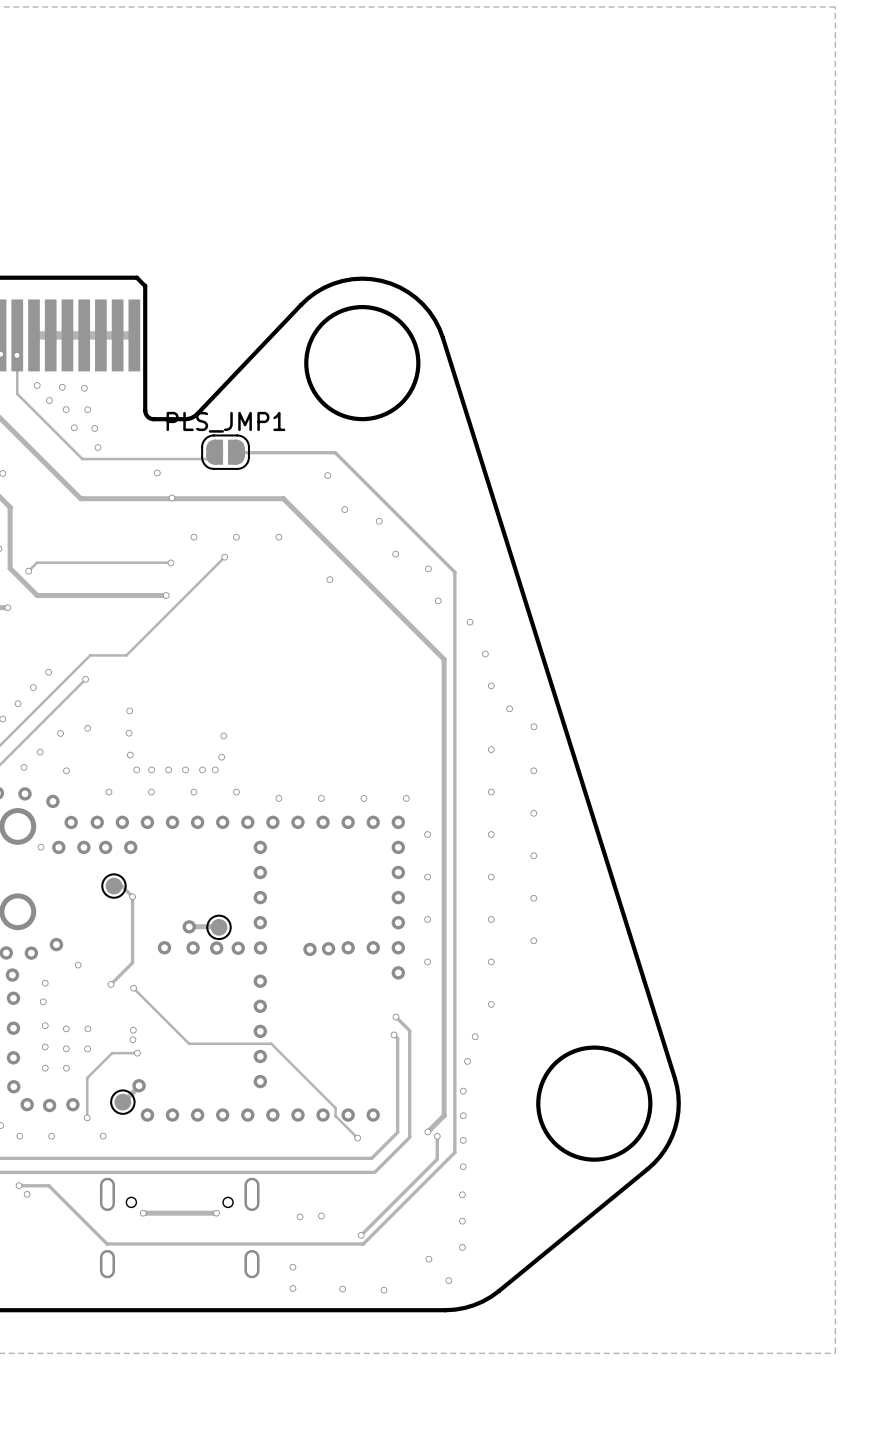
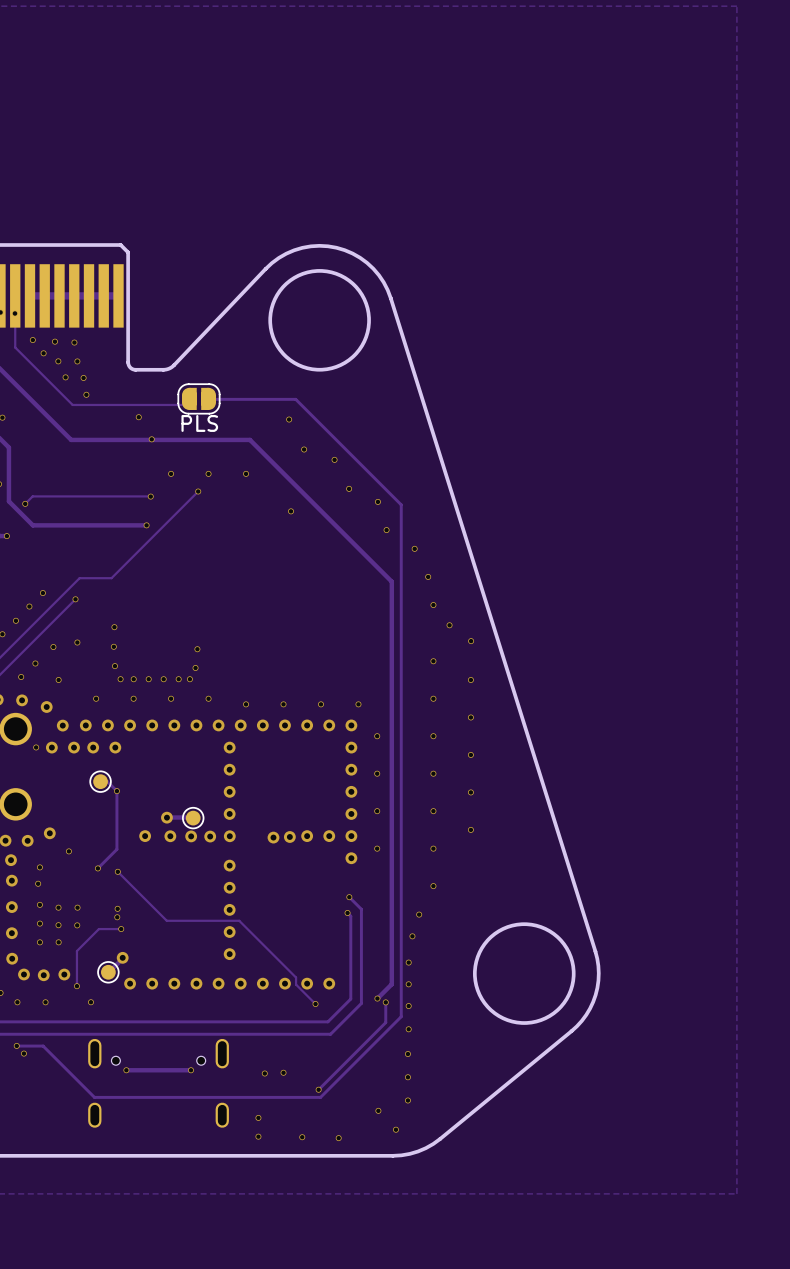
PLS_JMP1 name: PLS_JMP1 (225, 422) -> PLS (199, 423)

